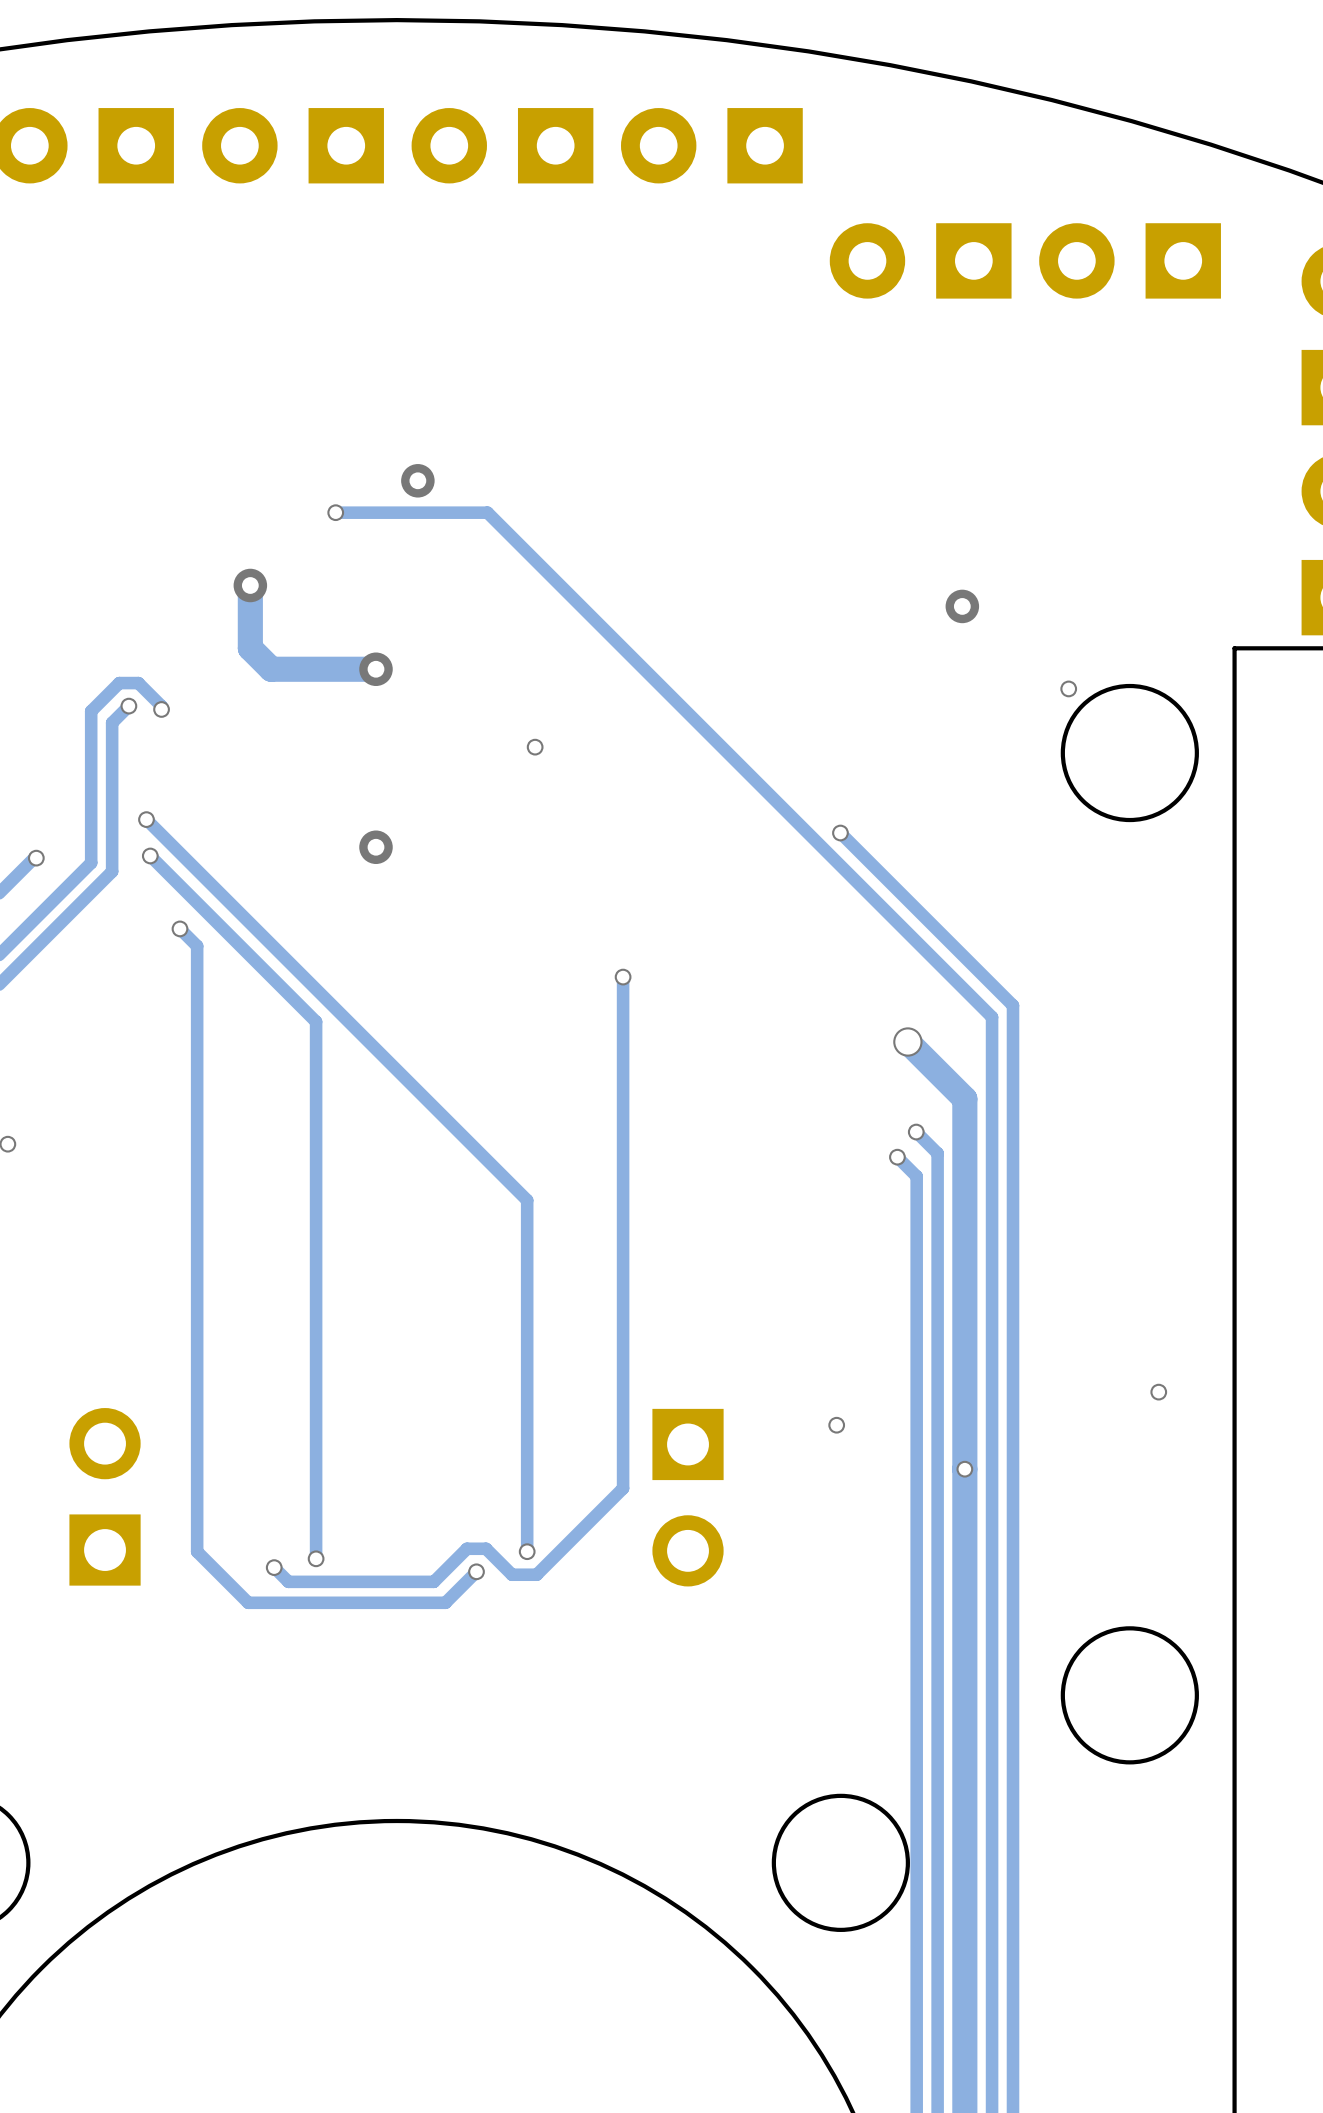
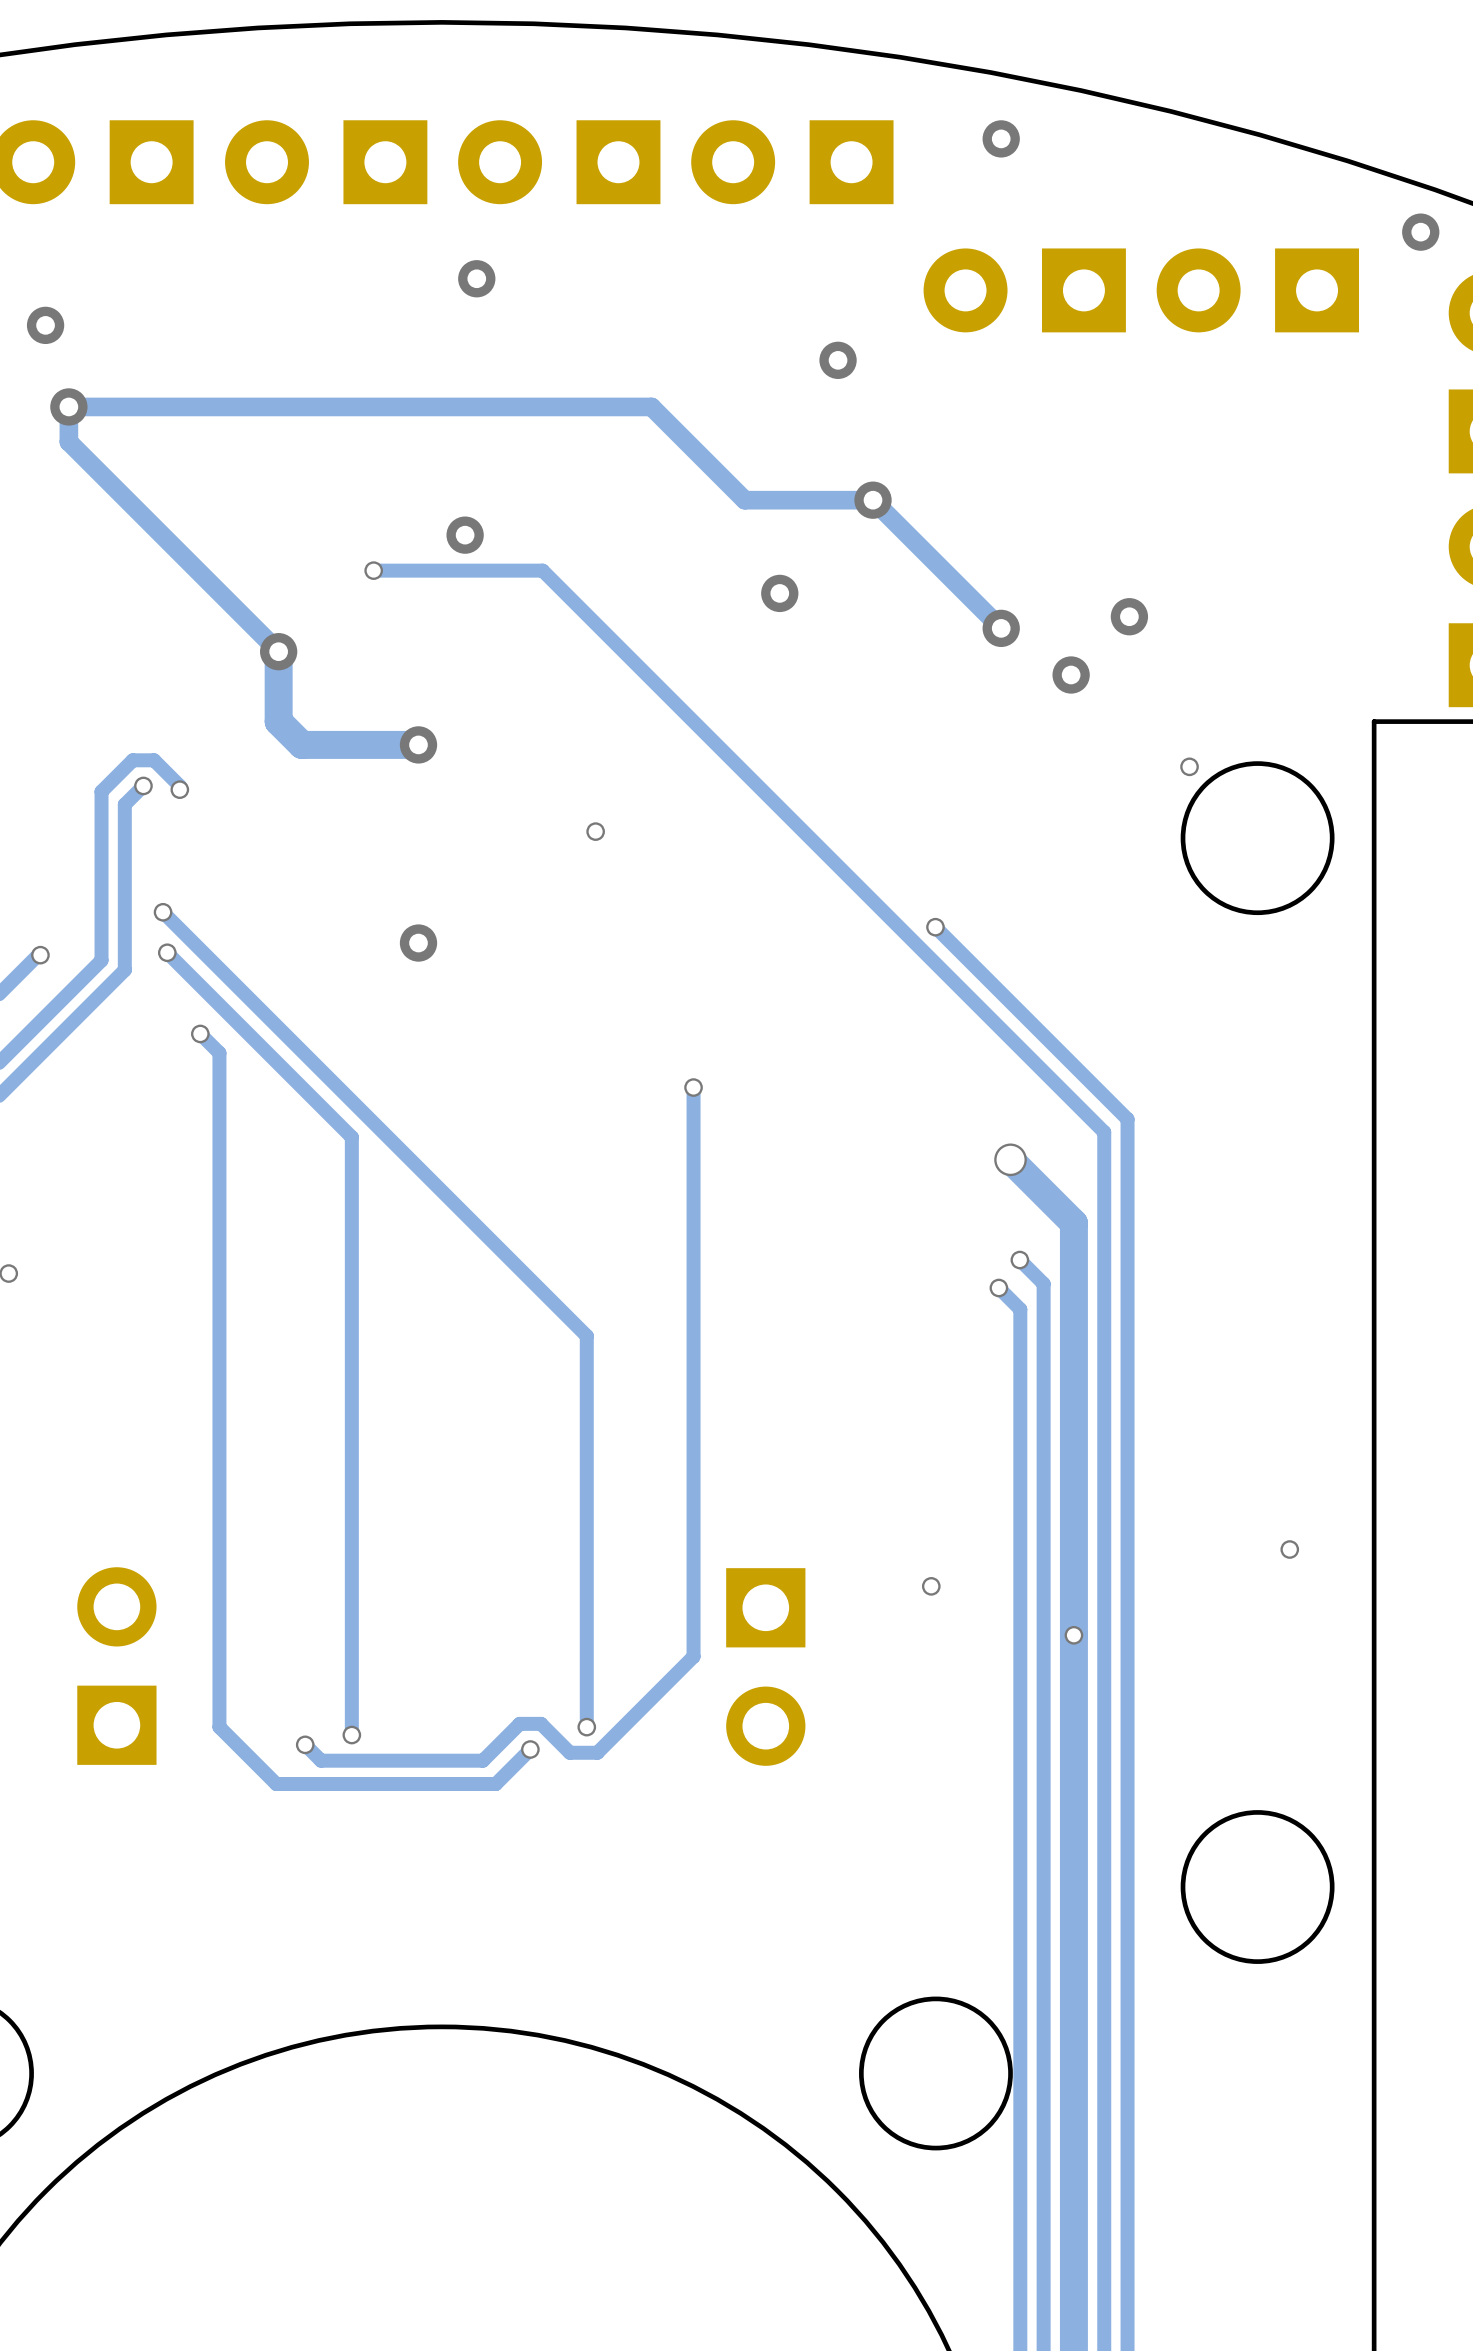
via: none -> (1001, 138)
via: none -> (1420, 232)
via: none -> (476, 278)
via: none -> (45, 325)
via: none -> (838, 360)
via: none -> (68, 406)
via: none -> (873, 500)
via: none -> (779, 593)
via: none -> (1129, 616)
track: none -> (1001, 628) (873, 500) (744, 500) (651, 406) (68, 406) (68, 441) (278, 651)
via: none -> (1001, 628)

